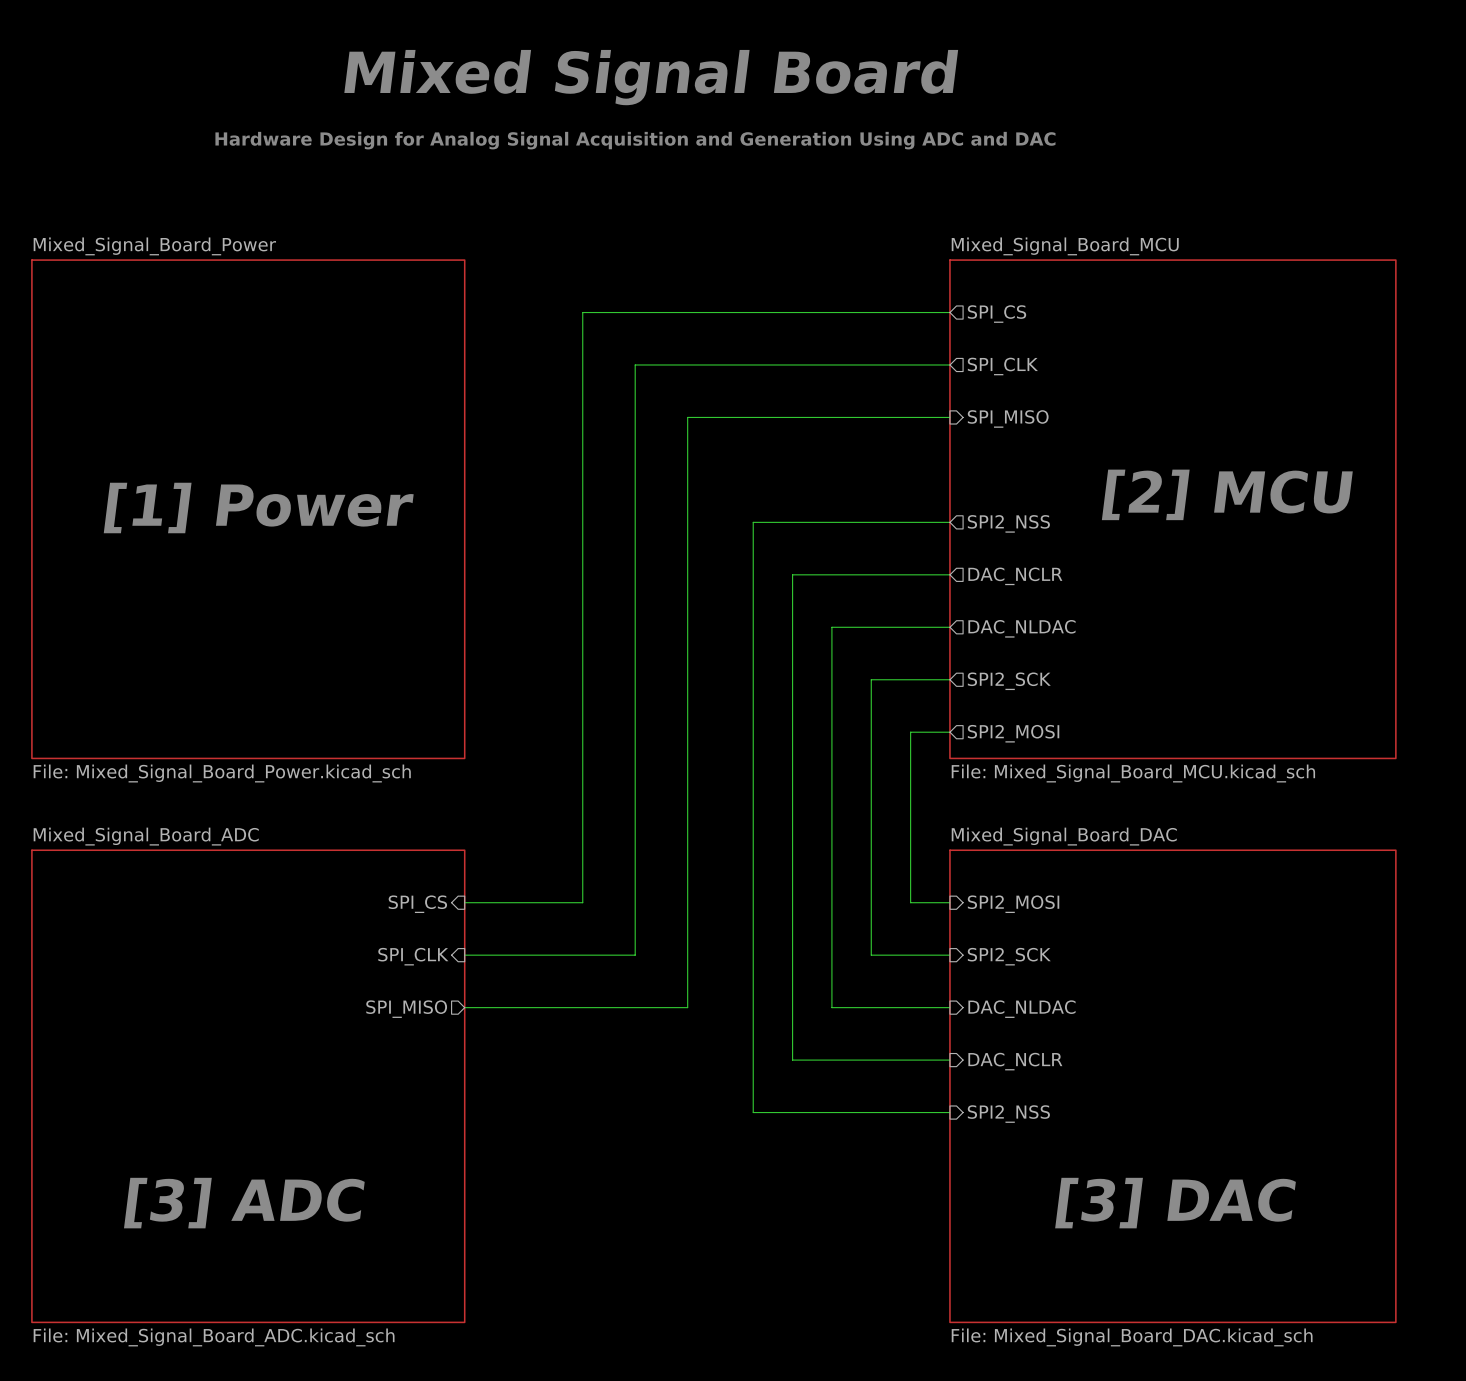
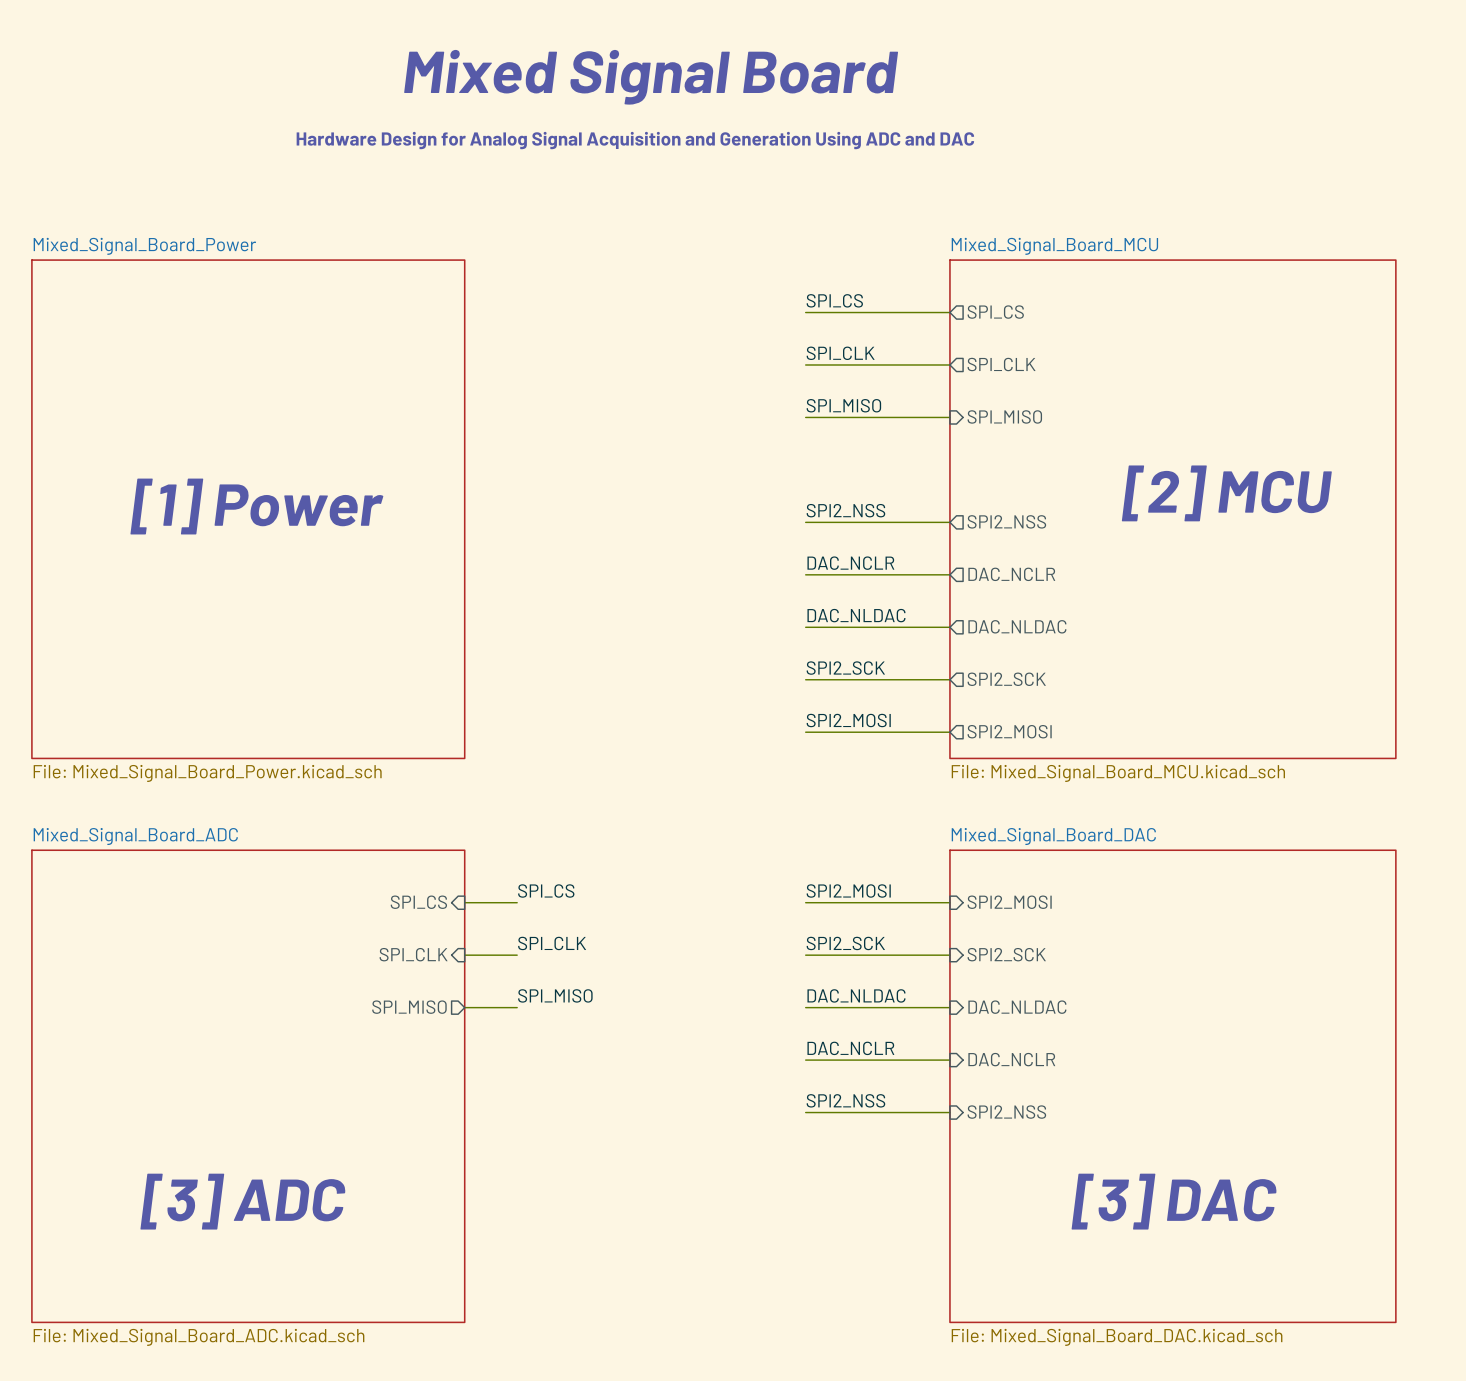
label: none -> SPI_CS (834, 300)
wire: (805, 312) (582, 312) (582, 902) (517, 902) -> none
label: none -> SPI_CLK (840, 353)
wire: (805, 364) (635, 364) (635, 955) (517, 955) -> none
label: none -> SPI_MISO (843, 405)
wire: (805, 417) (687, 417) (687, 1007) (517, 1007) -> none
label: none -> SPI2_NSS (845, 510)
wire: (805, 522) (753, 522) (753, 1112) (805, 1112) -> none
label: none -> DAC_NCLR (850, 563)
wire: (805, 574) (792, 574) (792, 1060) (805, 1060) -> none
label: none -> DAC_NLDAC (856, 615)
wire: (831, 627) (831, 1007) -> (831, 627) (805, 627)
label: none -> SPI2_SCK (845, 668)
wire: (871, 679) (871, 955) -> (871, 679) (805, 679)
label: none -> SPI2_MOSI (848, 720)
wire: (910, 732) (910, 902) -> (910, 732) (805, 732)
label: none -> SPI_CS (546, 891)
label: none -> SPI2_MOSI (848, 891)
wire: none -> (805, 902) (910, 902)
label: none -> SPI_CLK (552, 943)
label: none -> SPI2_SCK (845, 943)
wire: none -> (805, 955) (871, 955)
label: none -> SPI_MISO (555, 995)
label: none -> DAC_NLDAC (856, 995)
wire: none -> (805, 1007) (831, 1007)
label: none -> DAC_NCLR (850, 1048)
label: none -> SPI2_NSS (845, 1100)

